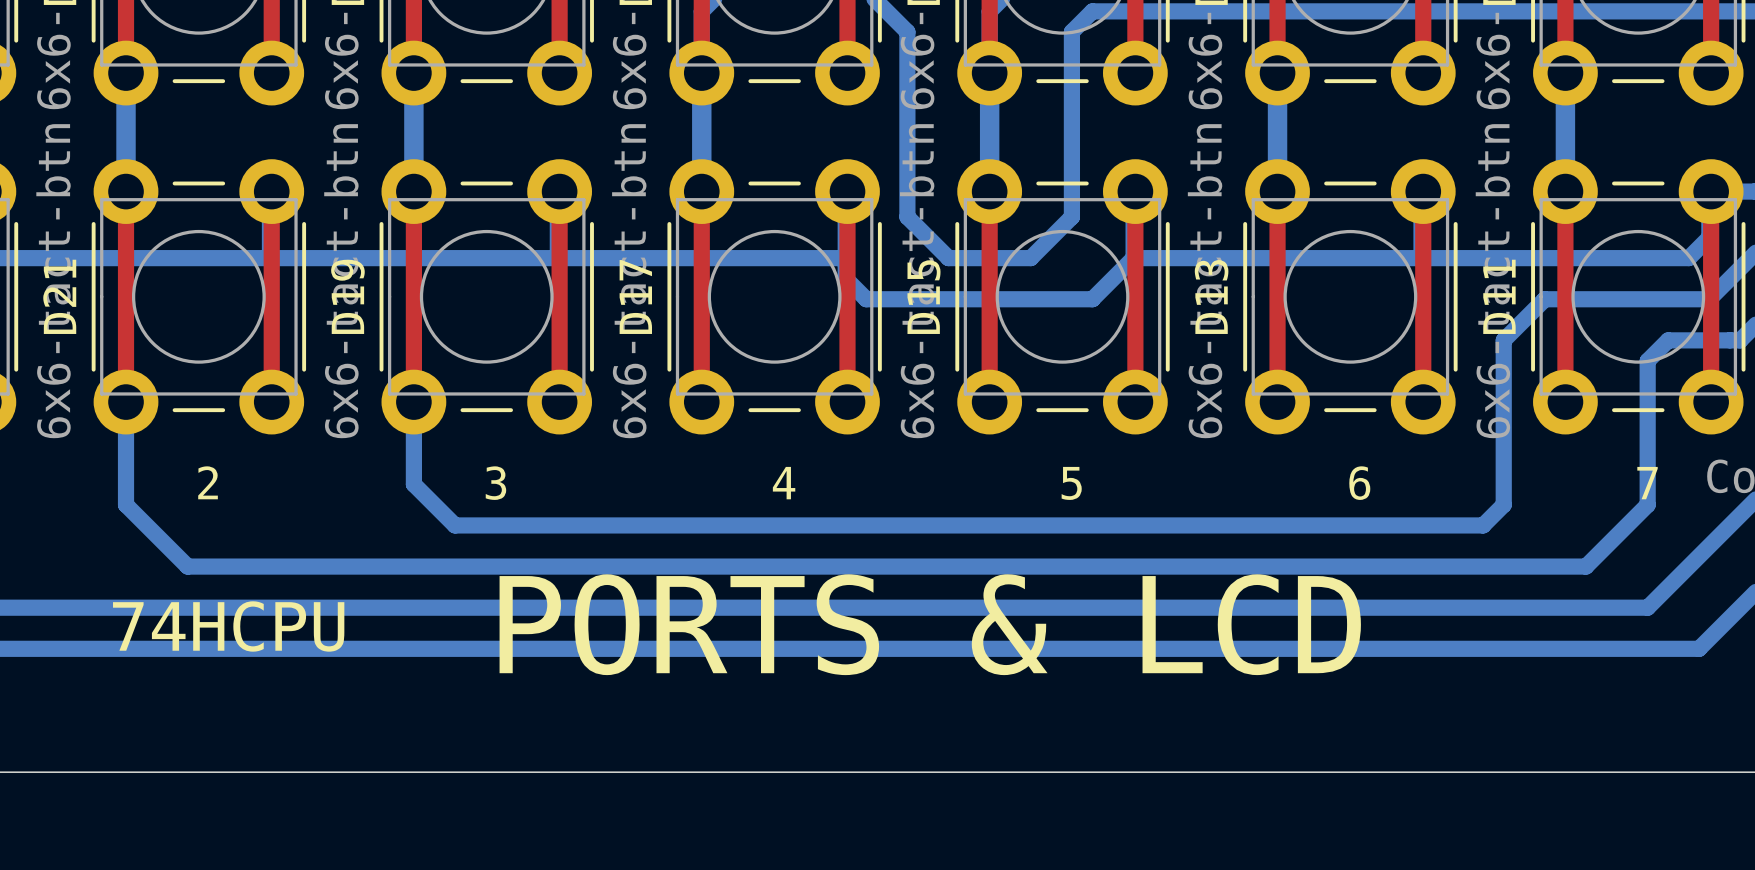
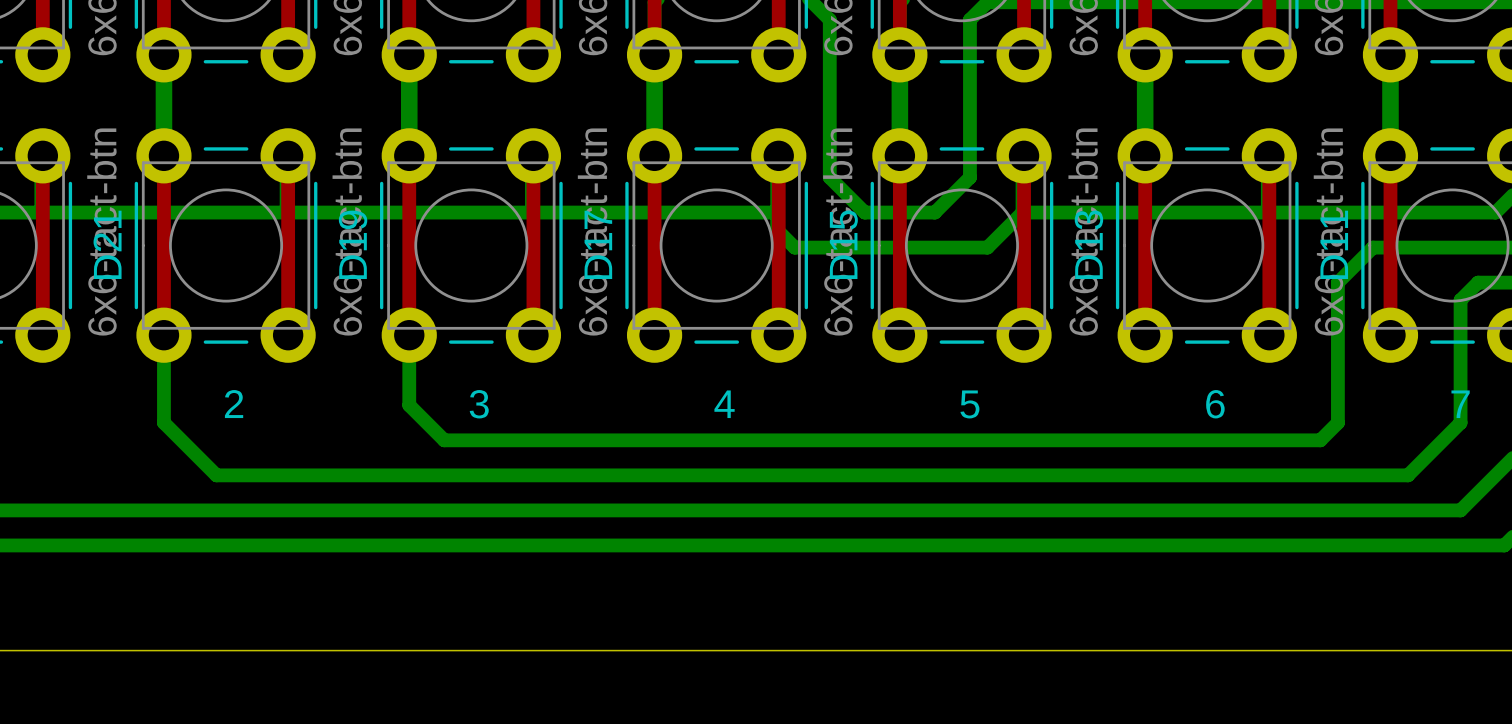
text: PORTS & LCD (930, 624) -> none
text: 74HCPU (228, 626) -> none

